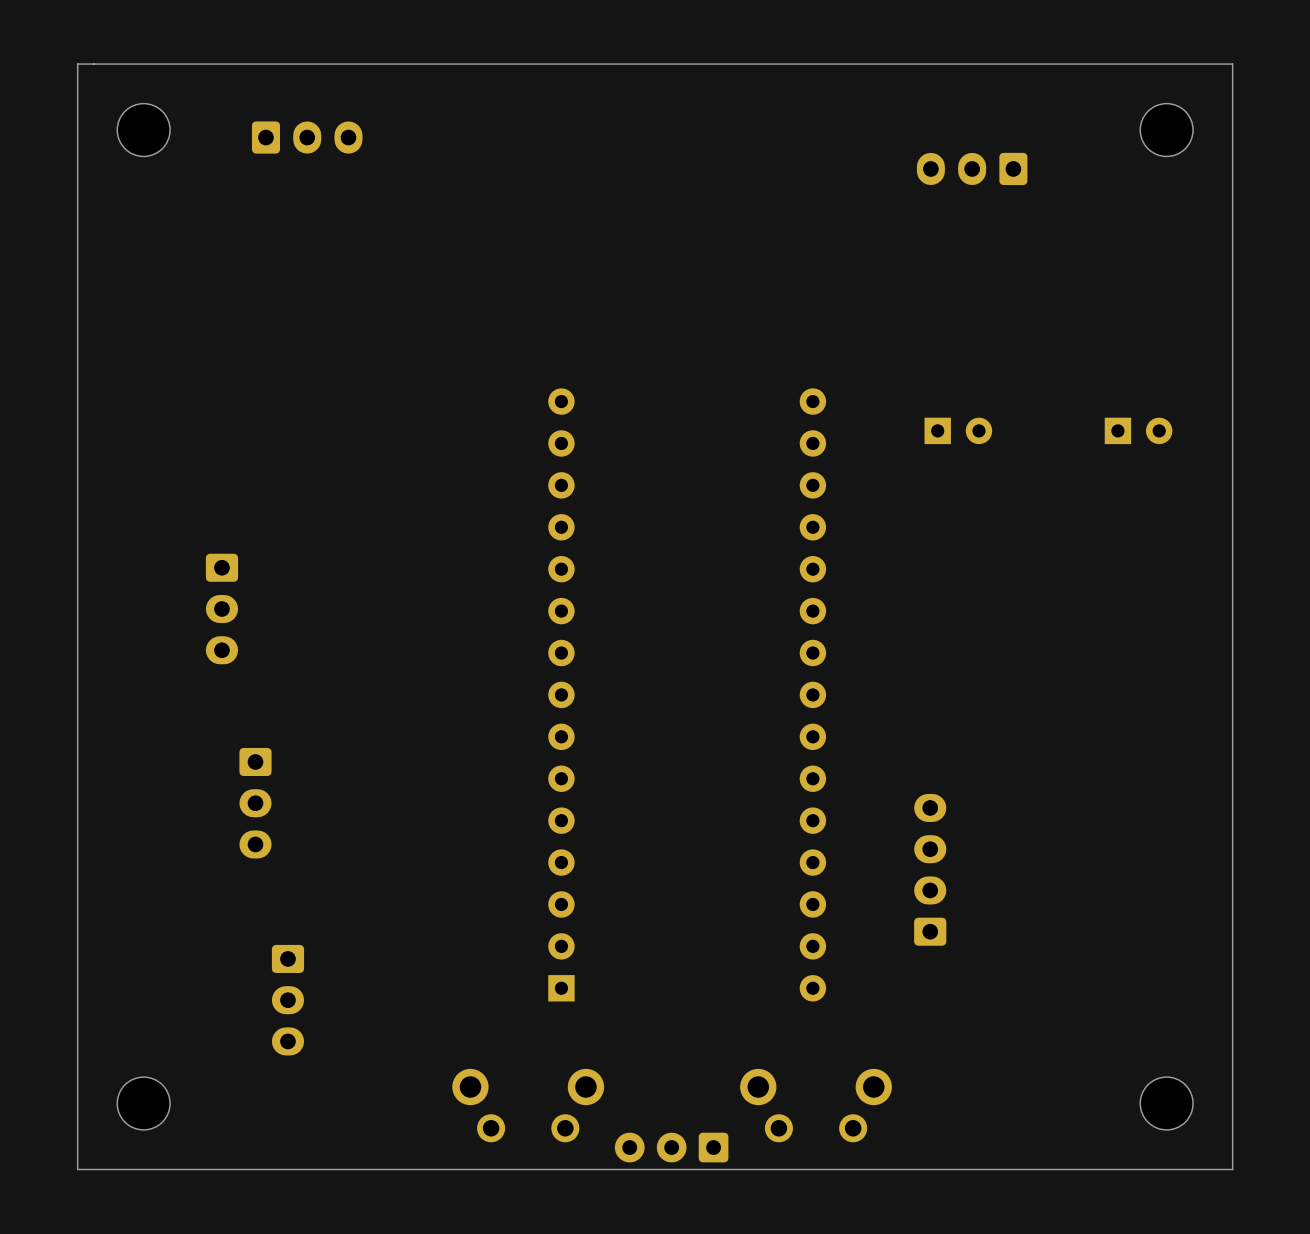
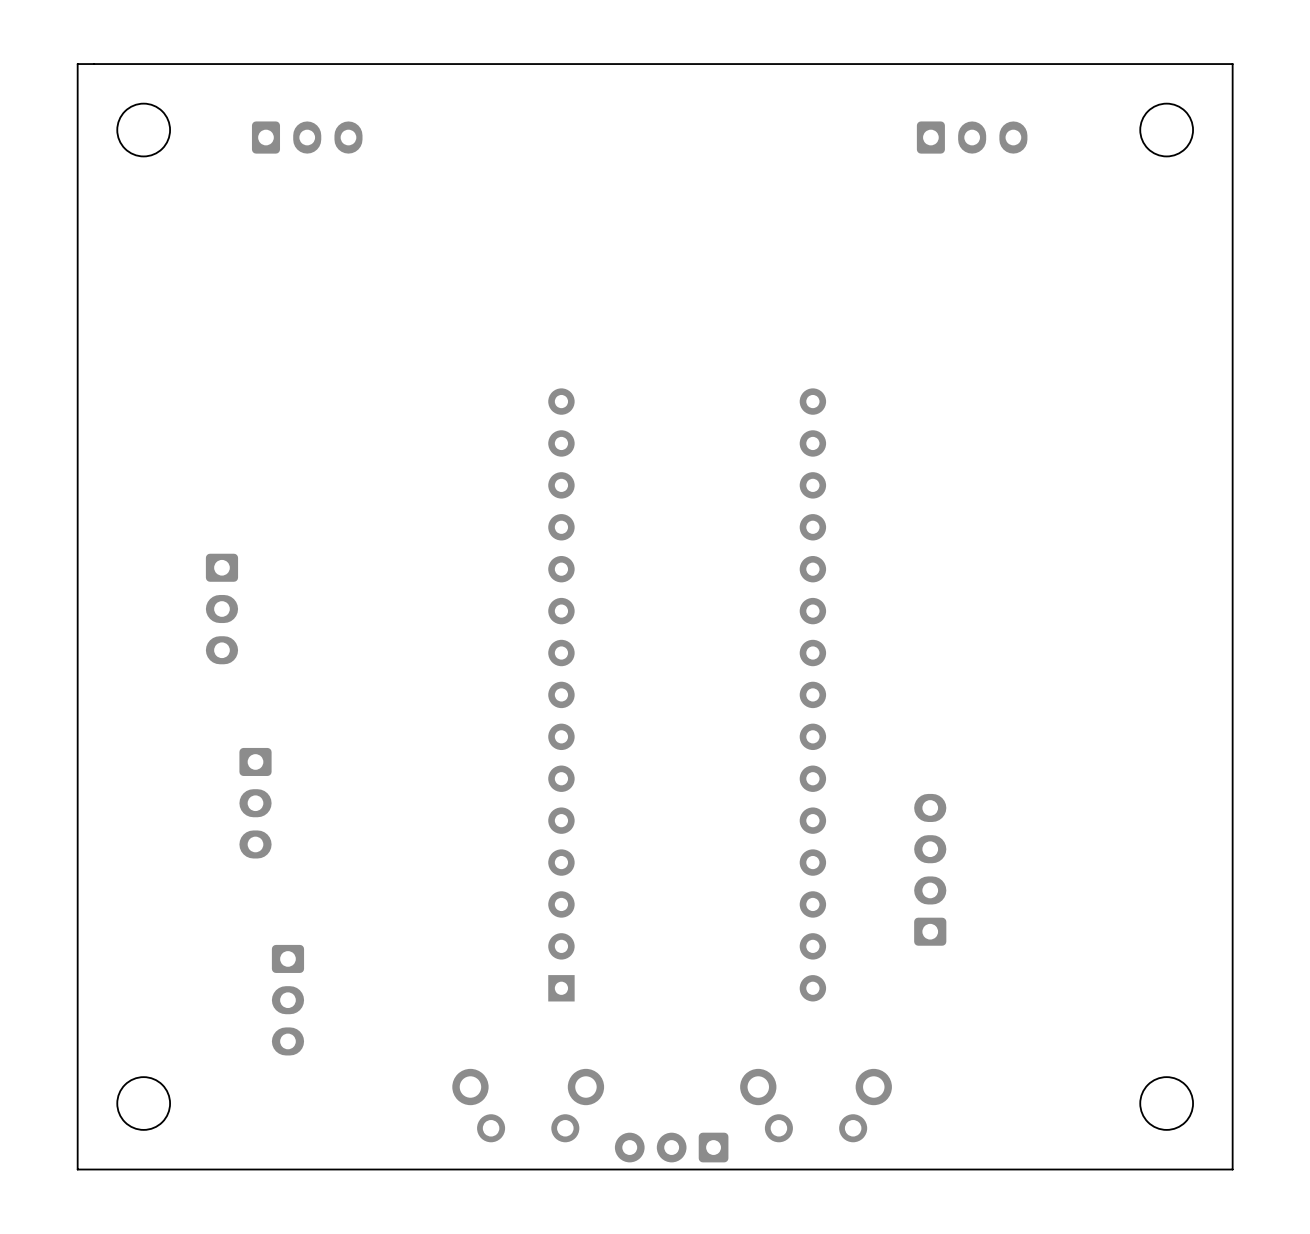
part rotation: 0° (972, 168) -> 180° (972, 137)
part: (958, 430) -> none
part: (1138, 430) -> none

